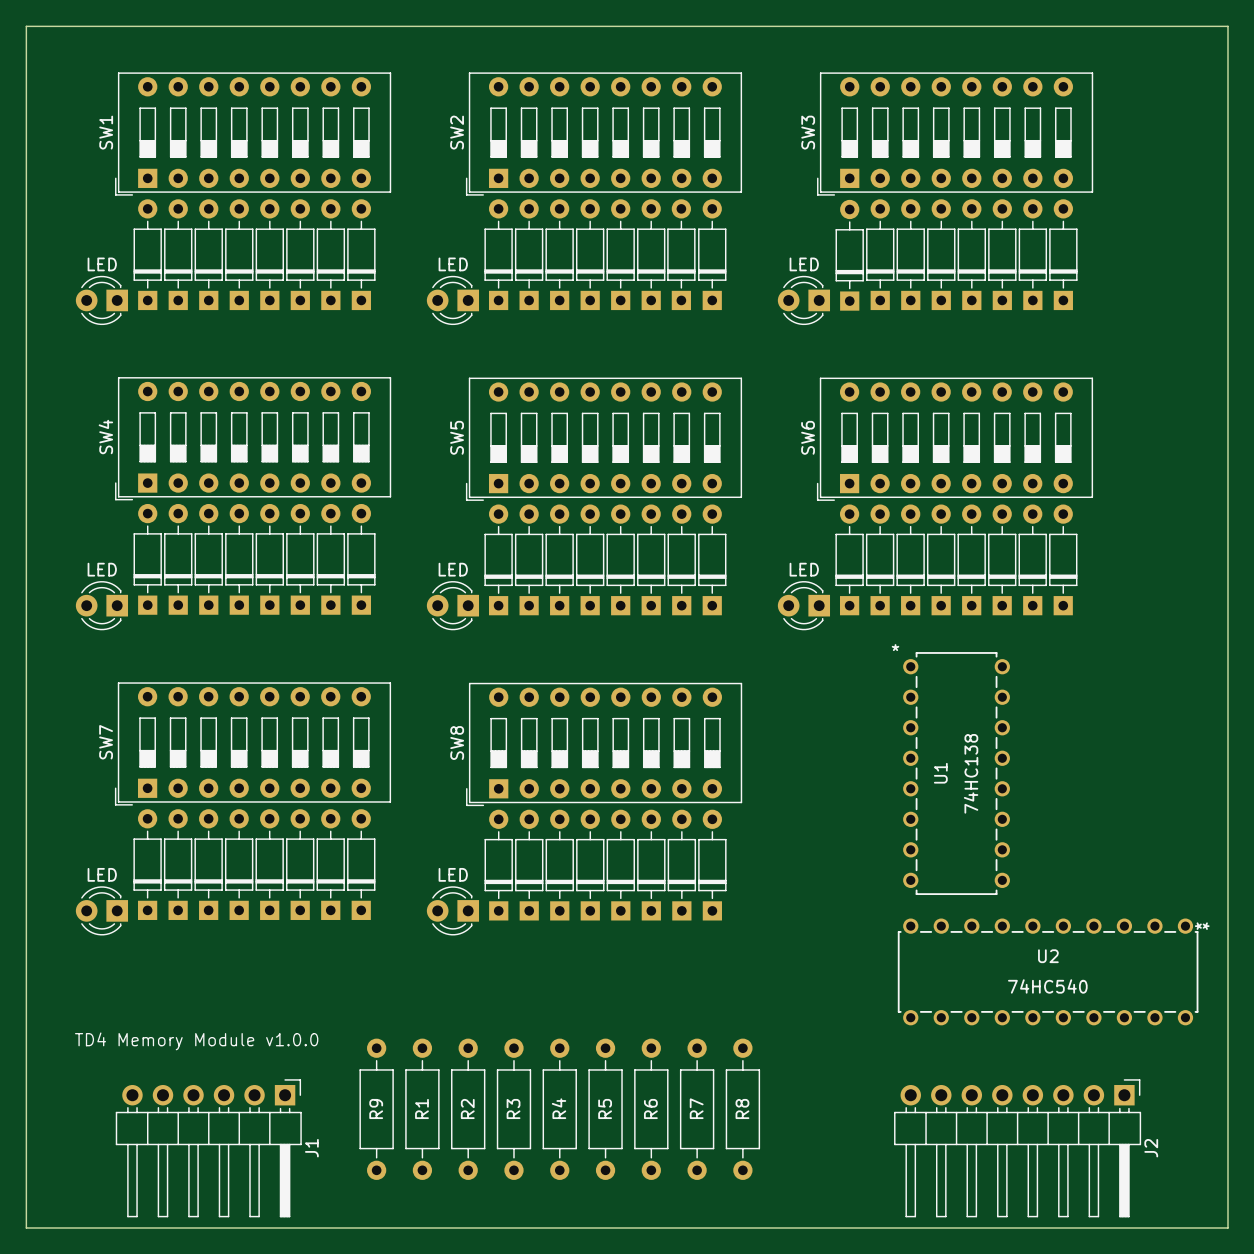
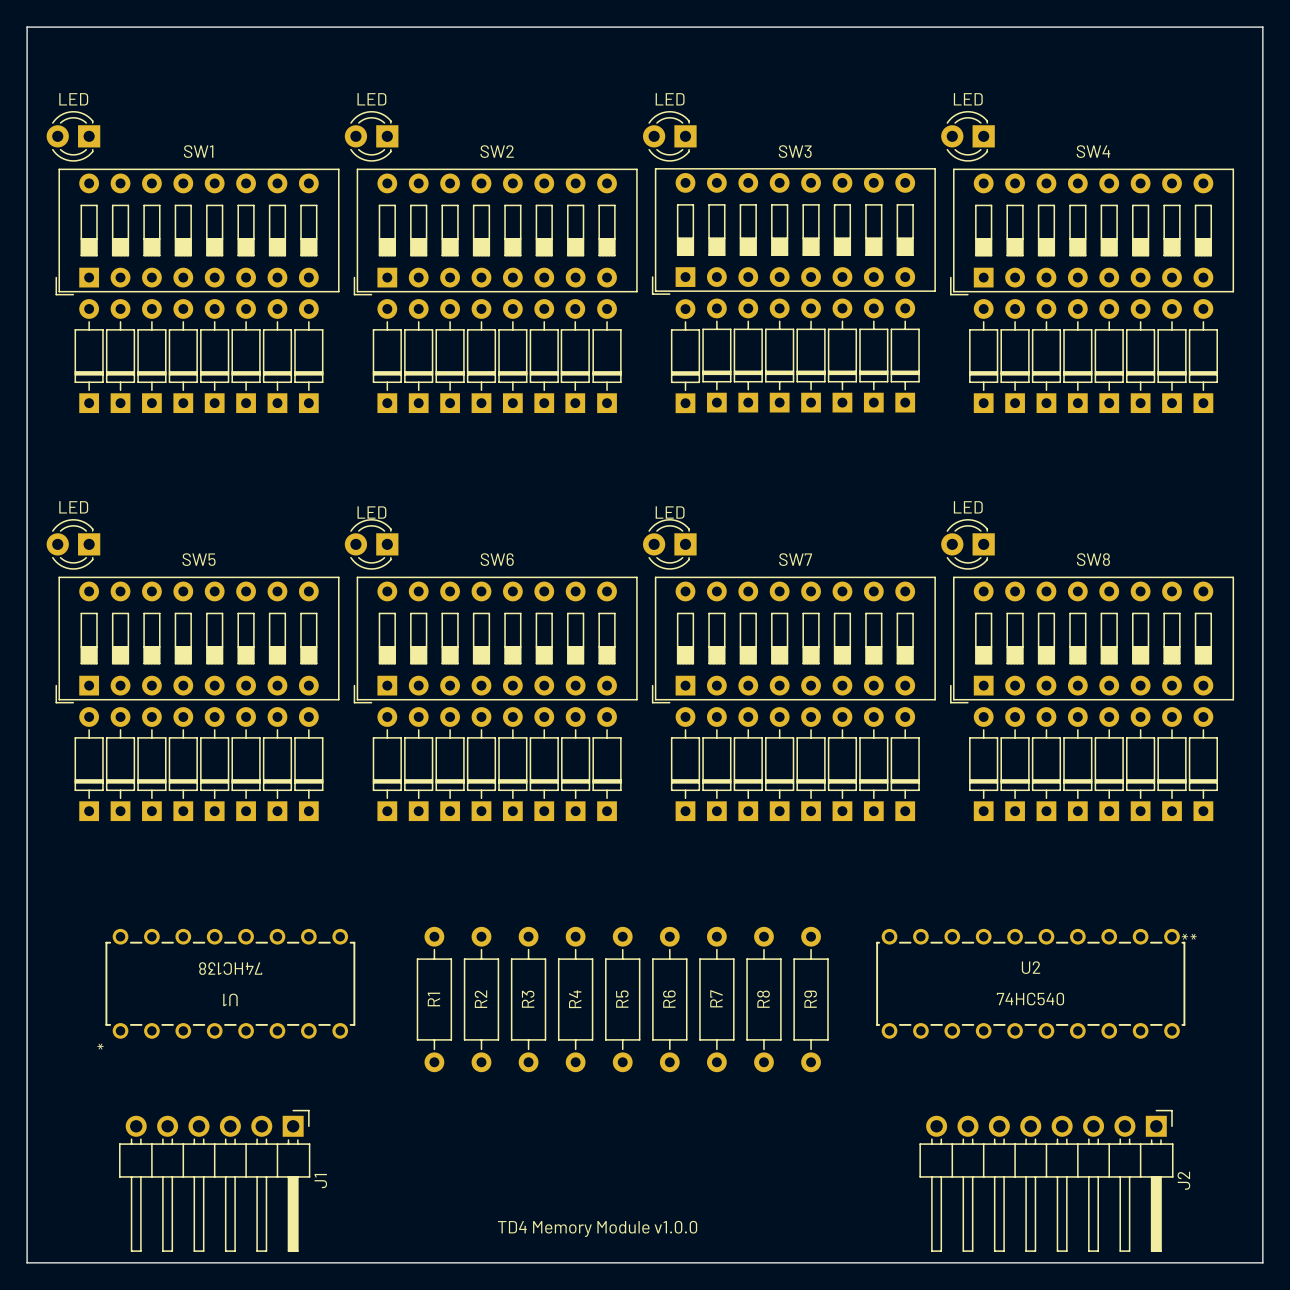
part: none -> LED (73, 136)
SW1 name rotation: 0° (106, 132) -> 90° clockwise (198, 151)
SW1 name position: SW1 (106, 132) -> SW1 (198, 151)
part: none -> LED (371, 136)
SW2 name rotation: 0° (457, 132) -> 90° clockwise (497, 151)
part: none -> LED (669, 136)
SW3 name rotation: 0° (808, 132) -> 90° clockwise (795, 151)
part: none -> LED (967, 136)
SW1 position: (253, 134) -> (197, 231)
SW2 position: (603, 134) -> (495, 231)
SW3 position: (955, 134) -> (793, 231)
part: (147, 254) -> none
part: (178, 254) -> none
part: (208, 254) -> none
part: (239, 254) -> none
part: (269, 254) -> none
part: (300, 254) -> none
part: (330, 254) -> none
part: (361, 254) -> none
part: (498, 254) -> none
part: (529, 254) -> none
part: (559, 254) -> none
part: (590, 254) -> none
part: (620, 254) -> none
part: (651, 254) -> none
part: (681, 254) -> none
part: (712, 254) -> none
part: (880, 254) -> none
part: (910, 254) -> none
part: (941, 254) -> none
part: (971, 254) -> none
part: (1002, 254) -> none
part: (1032, 254) -> none
part: (1063, 254) -> none
part: (849, 255) -> none
part: LED (101, 300) -> none
part: LED (452, 300) -> none
part: LED (803, 300) -> none
part: none -> (716, 355)
part: none -> (748, 355)
part: none -> (779, 355)
part: none -> (811, 355)
part: none -> (842, 355)
part: none -> (873, 355)
part: none -> (905, 355)
part: none -> (89, 356)
part: none -> (120, 356)
part: none -> (151, 356)
part: none -> (183, 356)
part: none -> (214, 356)
part: none -> (246, 356)
part: none -> (277, 356)
part: none -> (308, 356)
part: none -> (387, 356)
part: none -> (418, 356)
part: none -> (450, 356)
part: none -> (481, 356)
part: none -> (512, 356)
part: none -> (544, 356)
part: none -> (575, 356)
part: none -> (607, 356)
part: none -> (685, 356)
part: none -> (983, 356)
part: none -> (1015, 356)
part: none -> (1046, 356)
part: none -> (1077, 356)
part: none -> (1109, 356)
part: none -> (1140, 356)
part: none -> (1172, 356)
part: none -> (1203, 356)
SW4 name rotation: 0° (105, 437) -> 90° clockwise (1093, 151)
SW4 name position: SW4 (105, 437) -> SW4 (1093, 151)
SW5 name rotation: 0° (457, 437) -> 90° clockwise (199, 559)
SW5 name position: SW5 (457, 437) -> SW5 (199, 559)
SW6 name rotation: 0° (808, 437) -> 90° clockwise (497, 559)
SW6 name position: SW6 (808, 437) -> SW6 (497, 559)
SW4 position: (253, 438) -> (1092, 231)
SW5 position: (603, 439) -> (197, 640)
SW6 position: (954, 439) -> (495, 640)
part: none -> LED (371, 544)
part: none -> LED (669, 544)
part: none -> LED (967, 544)
part: (147, 559) -> none
part: (178, 559) -> none
part: (208, 559) -> none
part: (239, 559) -> none
part: (269, 559) -> none
part: (300, 559) -> none
part: (330, 559) -> none
part: (361, 559) -> none
part: (498, 559) -> none
part: (529, 559) -> none
part: (559, 559) -> none
part: (590, 559) -> none
part: (620, 559) -> none
part: (651, 559) -> none
part: (681, 559) -> none
part: (712, 559) -> none
part: (849, 559) -> none
part: (880, 559) -> none
part: (910, 559) -> none
part: (941, 559) -> none
part: (971, 559) -> none
part: (1002, 559) -> none
part: (1032, 559) -> none
part: (1063, 559) -> none
part position: (101, 605) -> (73, 544)
part: LED (452, 605) -> none
part: LED (803, 605) -> none
SW7 name rotation: 0° (106, 742) -> 90° clockwise (795, 559)
SW7 name position: SW7 (106, 742) -> SW7 (795, 559)
part: none -> (89, 764)
part: none -> (120, 764)
part: none -> (151, 764)
part: none -> (183, 764)
part: none -> (214, 764)
part: none -> (246, 764)
SW7 position: (252, 743) -> (793, 640)
part: none -> (277, 764)
part: none -> (308, 764)
part: none -> (387, 764)
part: none -> (418, 764)
part: none -> (450, 764)
SW8 name rotation: 0° (457, 743) -> 90° clockwise (1093, 559)
SW8 name position: SW8 (457, 743) -> SW8 (1093, 559)
part: none -> (481, 764)
part: none -> (512, 764)
part: none -> (544, 764)
part: none -> (575, 764)
part: none -> (607, 764)
part: none -> (685, 764)
part: none -> (716, 764)
part: none -> (748, 764)
part: none -> (779, 764)
part: none -> (811, 764)
part: none -> (842, 764)
part: none -> (873, 764)
part: none -> (905, 764)
part: none -> (983, 764)
part: none -> (1015, 764)
part: none -> (1046, 764)
part: none -> (1077, 764)
part: none -> (1109, 764)
part: none -> (1140, 764)
part: none -> (1172, 764)
part: none -> (1203, 764)
SW8 position: (604, 744) -> (1092, 640)
U1 rotation: 0° (956, 773) -> 90° counterclockwise (230, 983)
U1 position: (956, 773) -> (230, 983)
part: (147, 864) -> none
part: (178, 864) -> none
part: (208, 864) -> none
part: (239, 864) -> none
part: (269, 864) -> none
part: (300, 864) -> none
part: (330, 864) -> none
part: (361, 864) -> none
part: (498, 865) -> none
part: (529, 865) -> none
part: (559, 865) -> none
part: (590, 865) -> none
part: (620, 865) -> none
part: (651, 865) -> none
part: (681, 865) -> none
part: (712, 865) -> none
part: LED (101, 910) -> none
part: LED (452, 910) -> none
U2 position: (1048, 971) -> (1030, 983)
text: TD4 Memory Module v1.0.0 (196, 1041) -> none
R9 position: (376, 1109) -> (811, 999)
R1 position: (422, 1109) -> (434, 999)
R2 position: (468, 1109) -> (481, 999)
R3 position: (513, 1109) -> (528, 999)
R4 position: (559, 1109) -> (575, 999)
R5 position: (605, 1109) -> (622, 999)
R6 position: (651, 1109) -> (669, 999)
R7 position: (697, 1109) -> (716, 999)
R8 position: (742, 1109) -> (763, 999)
text: none -> TD4 Memory Module v1.0.0 (597, 1228)

